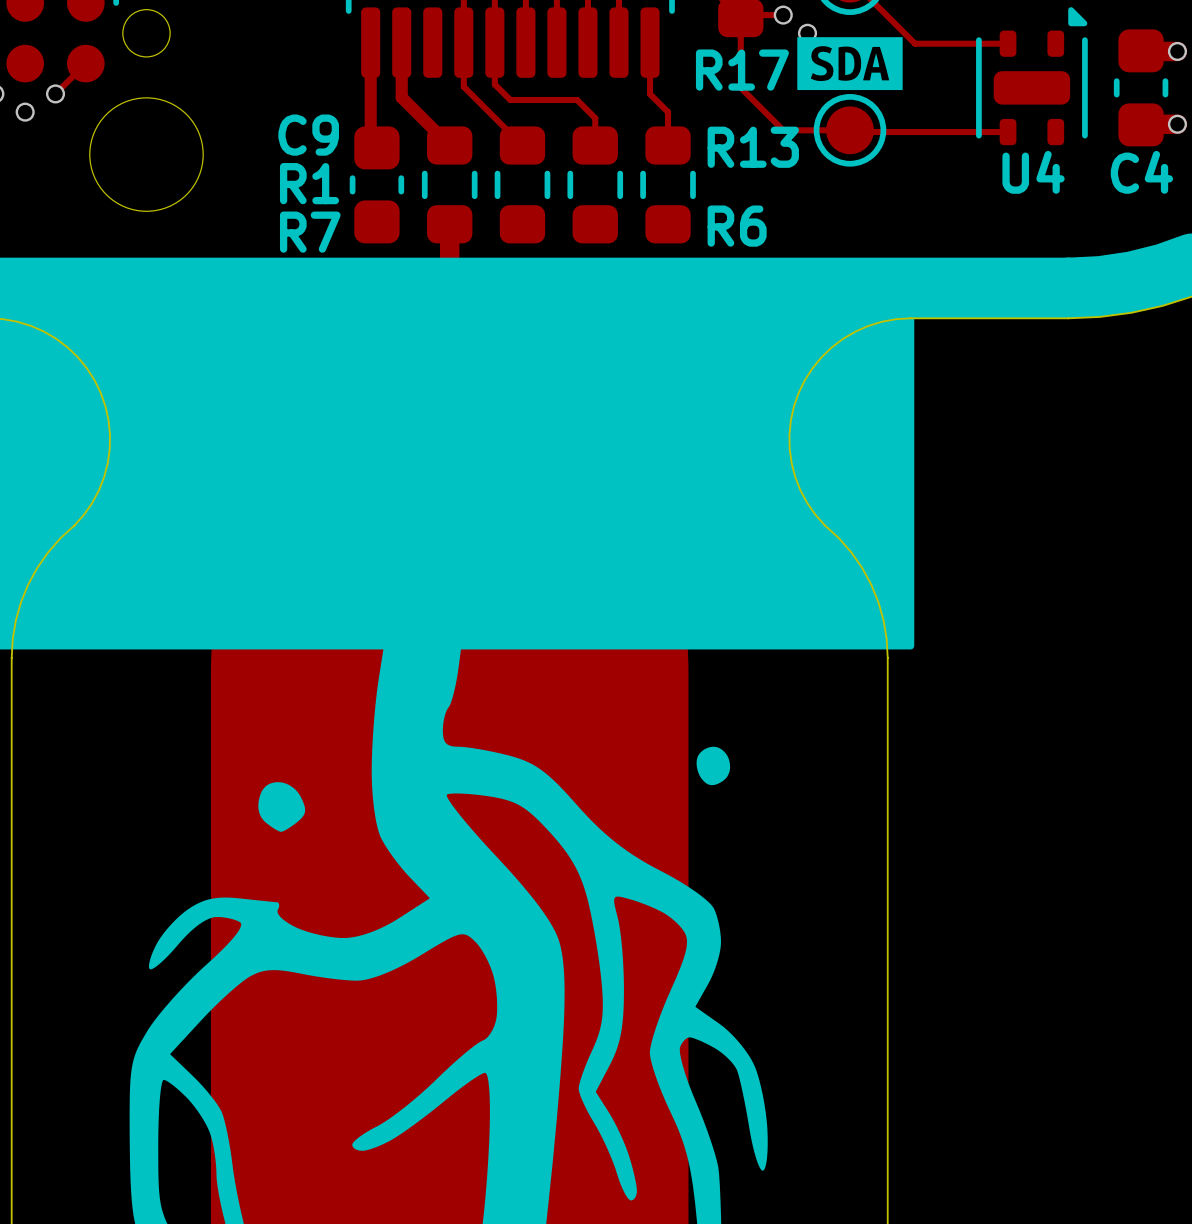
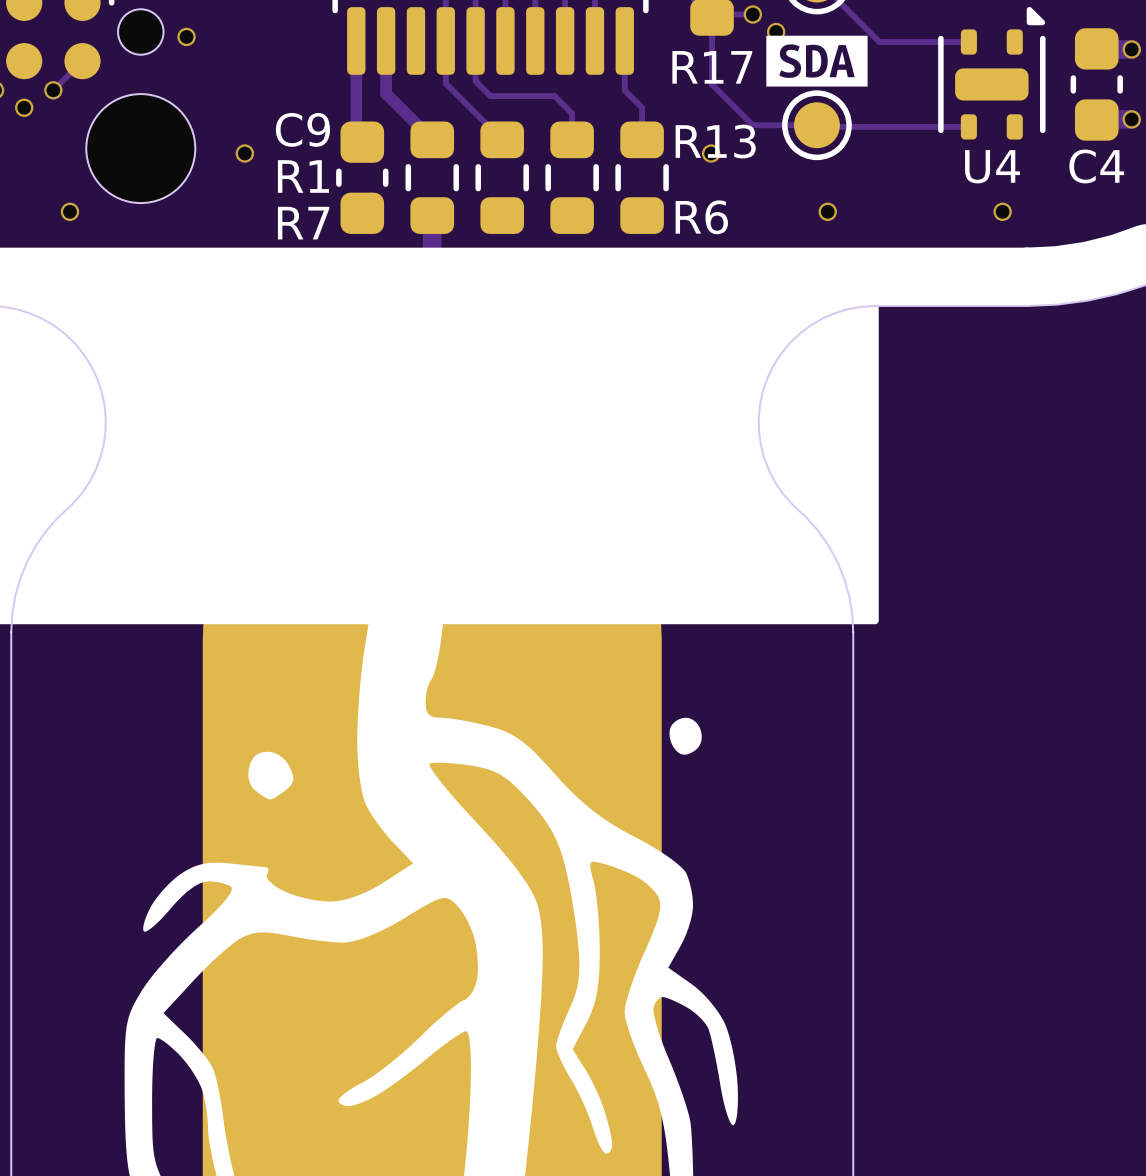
via: none -> (186, 36)
via: none -> (244, 153)
via: none -> (711, 153)
via: none -> (69, 211)
via: none -> (827, 211)
via: none -> (1002, 211)

